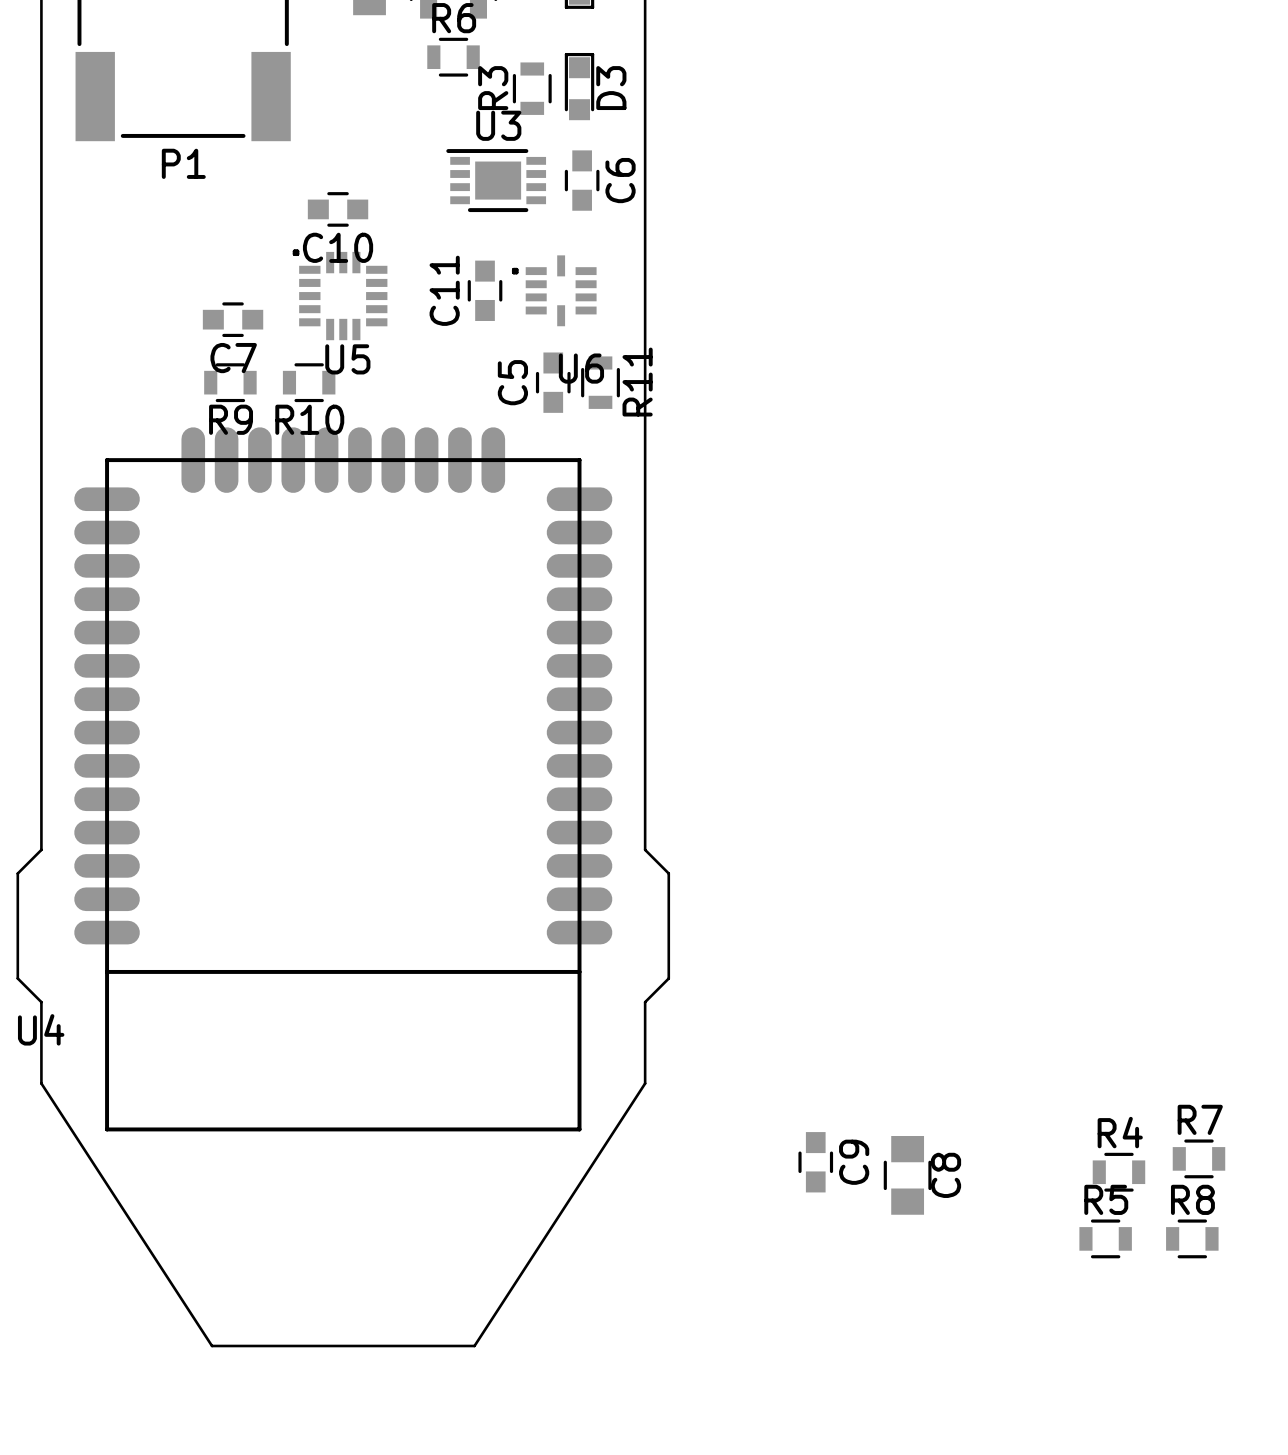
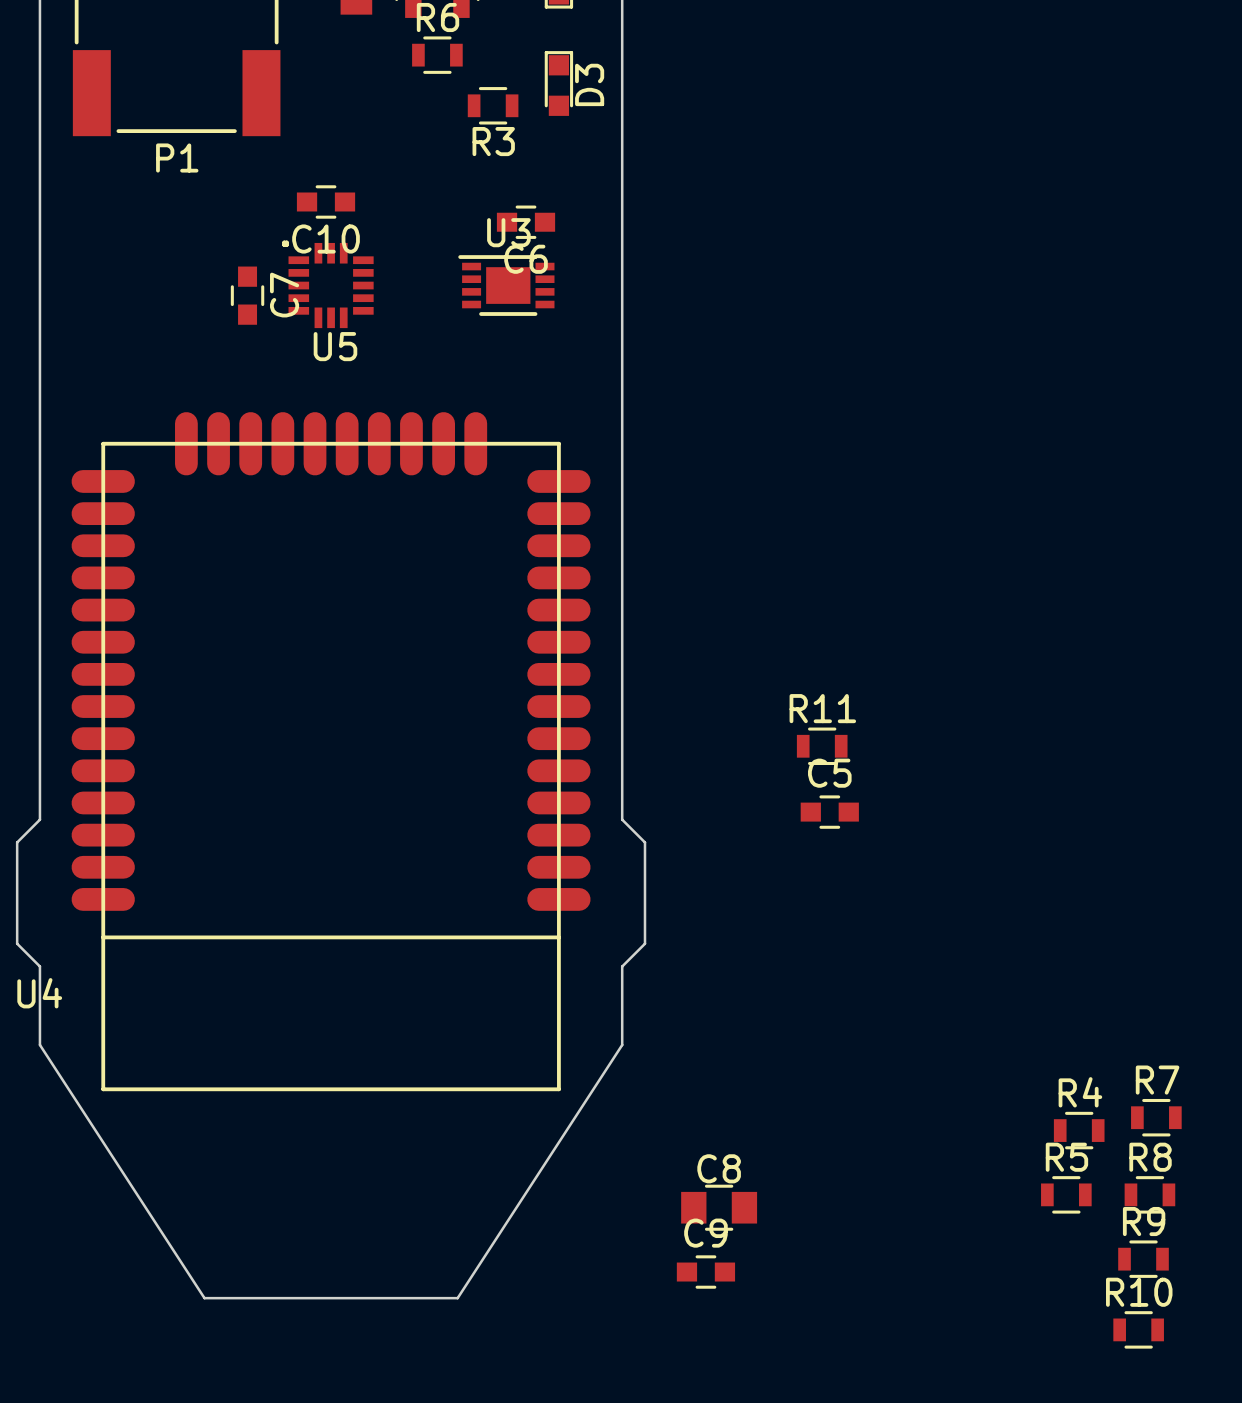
R3 name position: R3 (493, 88) -> R3 (493, 141)
R3 rotation: 0° (532, 88) -> 90° clockwise (493, 105)
U3 position: (496, 180) -> (506, 285)
C6 rotation: 0° (582, 180) -> 90° clockwise (526, 222)
C6 position: (582, 180) -> (526, 222)
C11: (485, 290) -> none
U6: (554, 290) -> none
C7 rotation: 0° (233, 319) -> 90° clockwise (247, 295)
C7 name position: C7 (233, 358) -> C7 (284, 295)
R9 position: (230, 382) -> (1143, 1259)
R10 position: (309, 382) -> (1138, 1329)
C5 rotation: 0° (553, 382) -> 90° clockwise (829, 812)
C5 position: (553, 382) -> (829, 812)
R11 rotation: 0° (600, 382) -> 90° clockwise (822, 746)
R11 position: (600, 382) -> (822, 746)
R11 name position: R11 (637, 382) -> R11 (822, 708)
R9 name position: R9 (231, 419) -> R9 (1144, 1221)
R10 name position: R10 (309, 419) -> R10 (1139, 1292)
C9 rotation: 0° (815, 1162) -> 90° clockwise (705, 1272)
C9 position: (815, 1162) -> (705, 1272)
C9 name position: C9 (854, 1162) -> C9 (705, 1233)
C8 rotation: 0° (907, 1175) -> 90° clockwise (719, 1207)
C8 position: (907, 1175) -> (719, 1207)
C8 name position: C8 (946, 1175) -> C8 (719, 1168)

